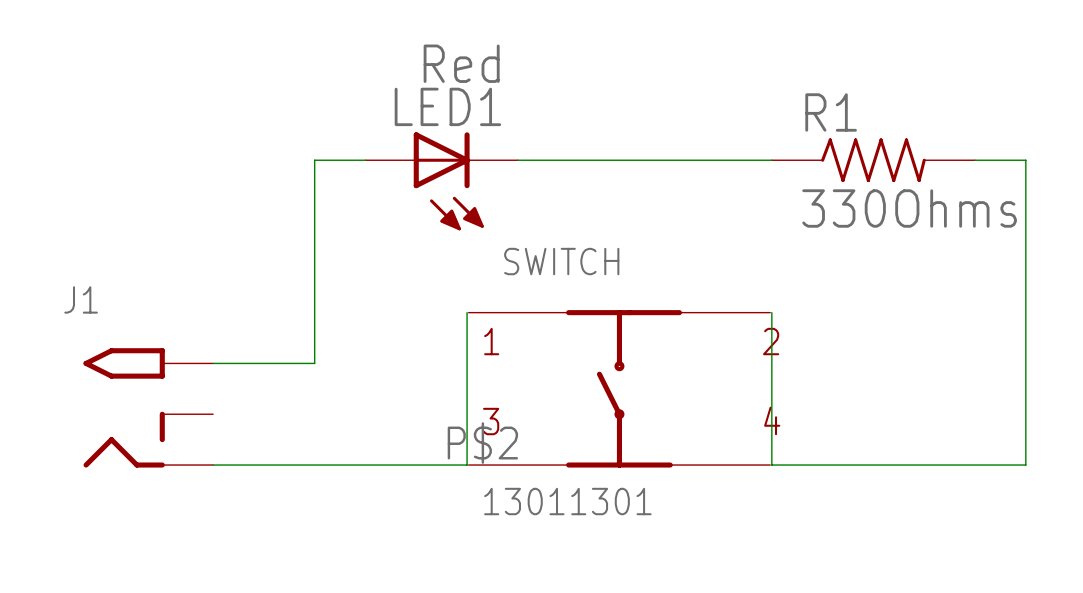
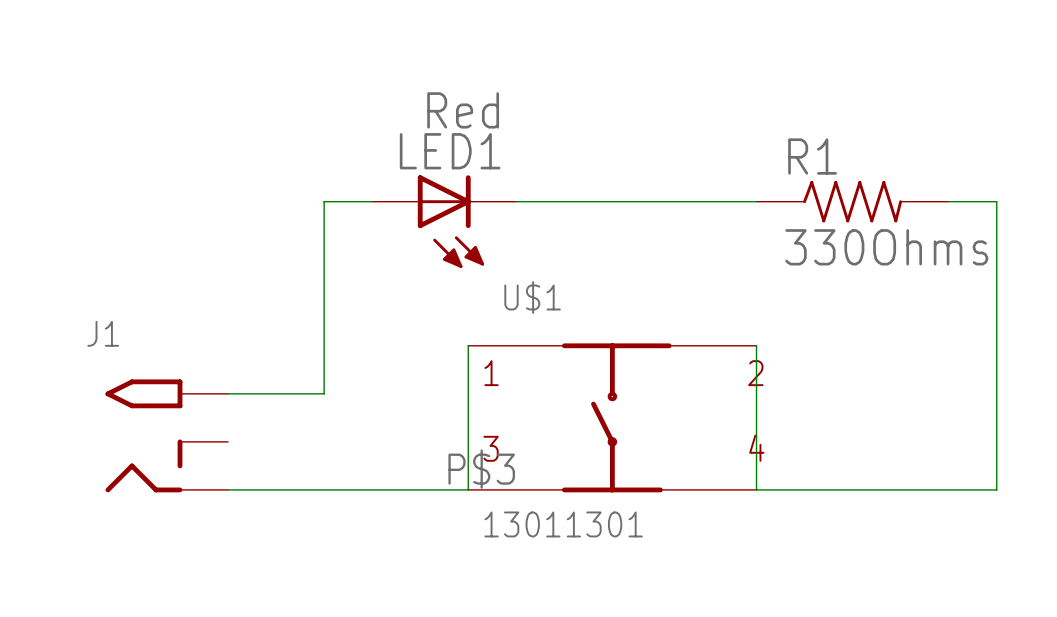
SWITCH: 13011301 (619, 388) -> none
U$1: none -> 13011301 (612, 417)

